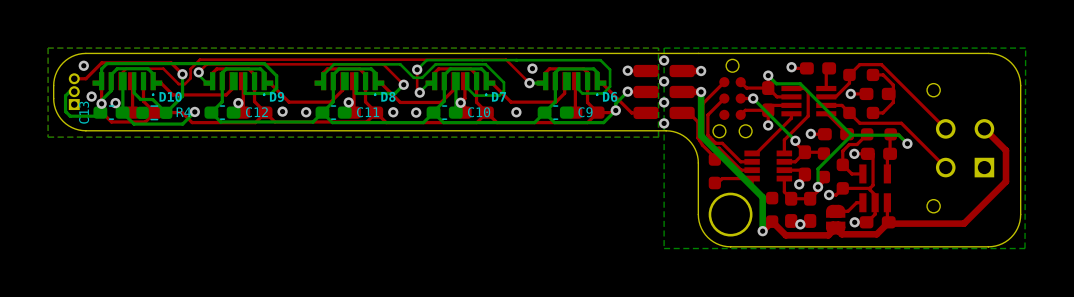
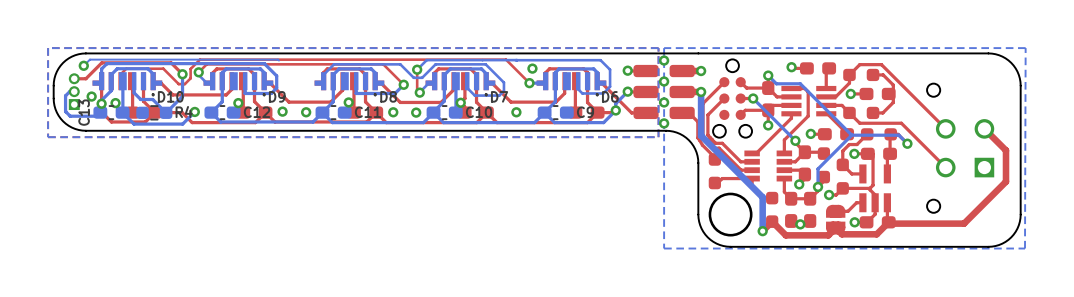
bottom track: none -> (278, 60) (89, 59) (83, 65)

